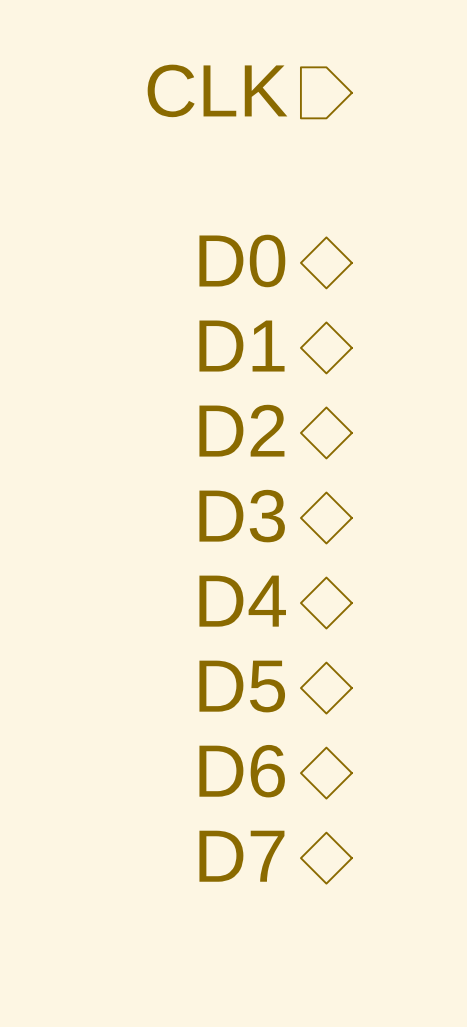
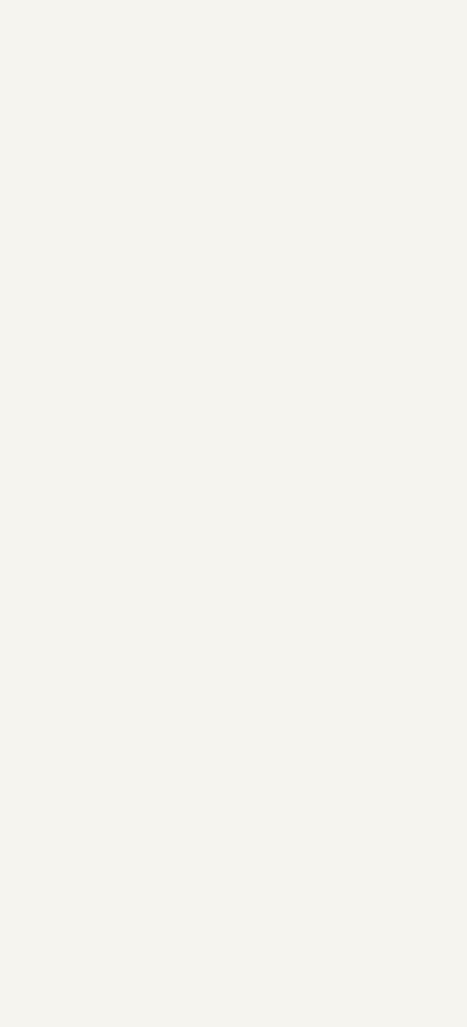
hierarchical label: CLK (217, 90) -> none
hierarchical label: D0 (242, 260) -> none
hierarchical label: D1 (242, 346) -> none
hierarchical label: D2 (241, 430) -> none
hierarchical label: D3 (242, 516) -> none
hierarchical label: D4 (242, 601) -> none
hierarchical label: D5 (242, 686) -> none
hierarchical label: D6 (242, 771) -> none
hierarchical label: D7 (241, 856) -> none

